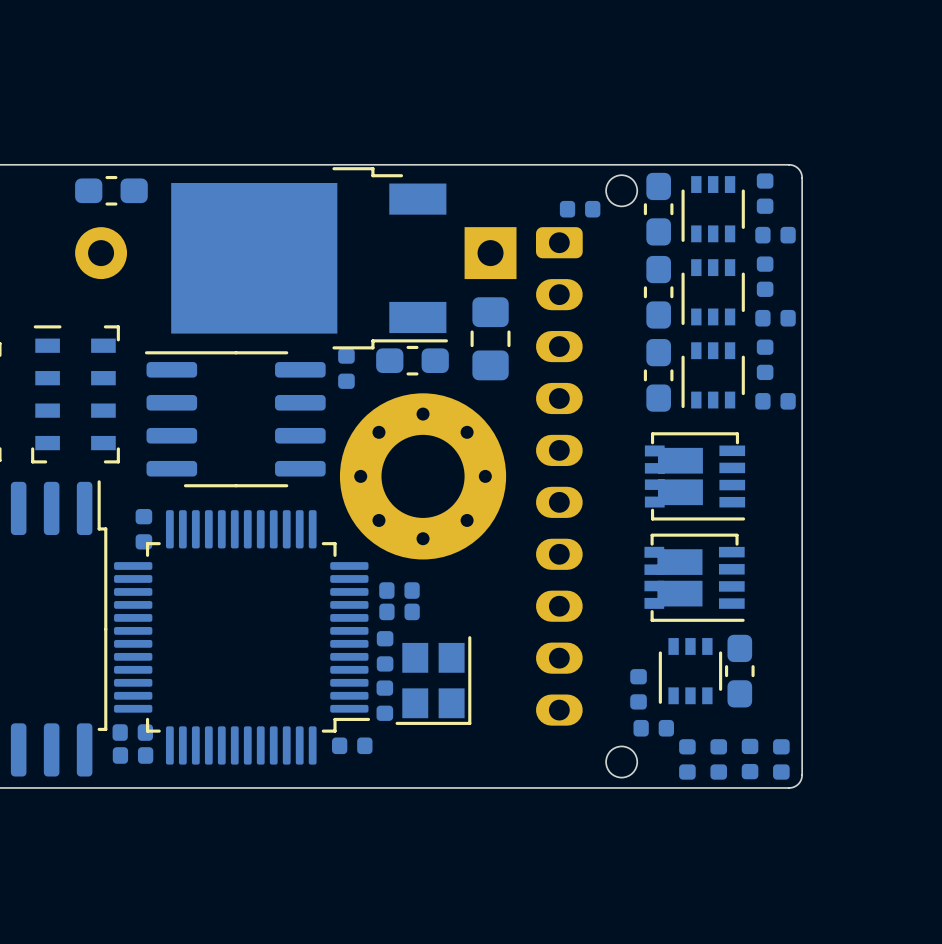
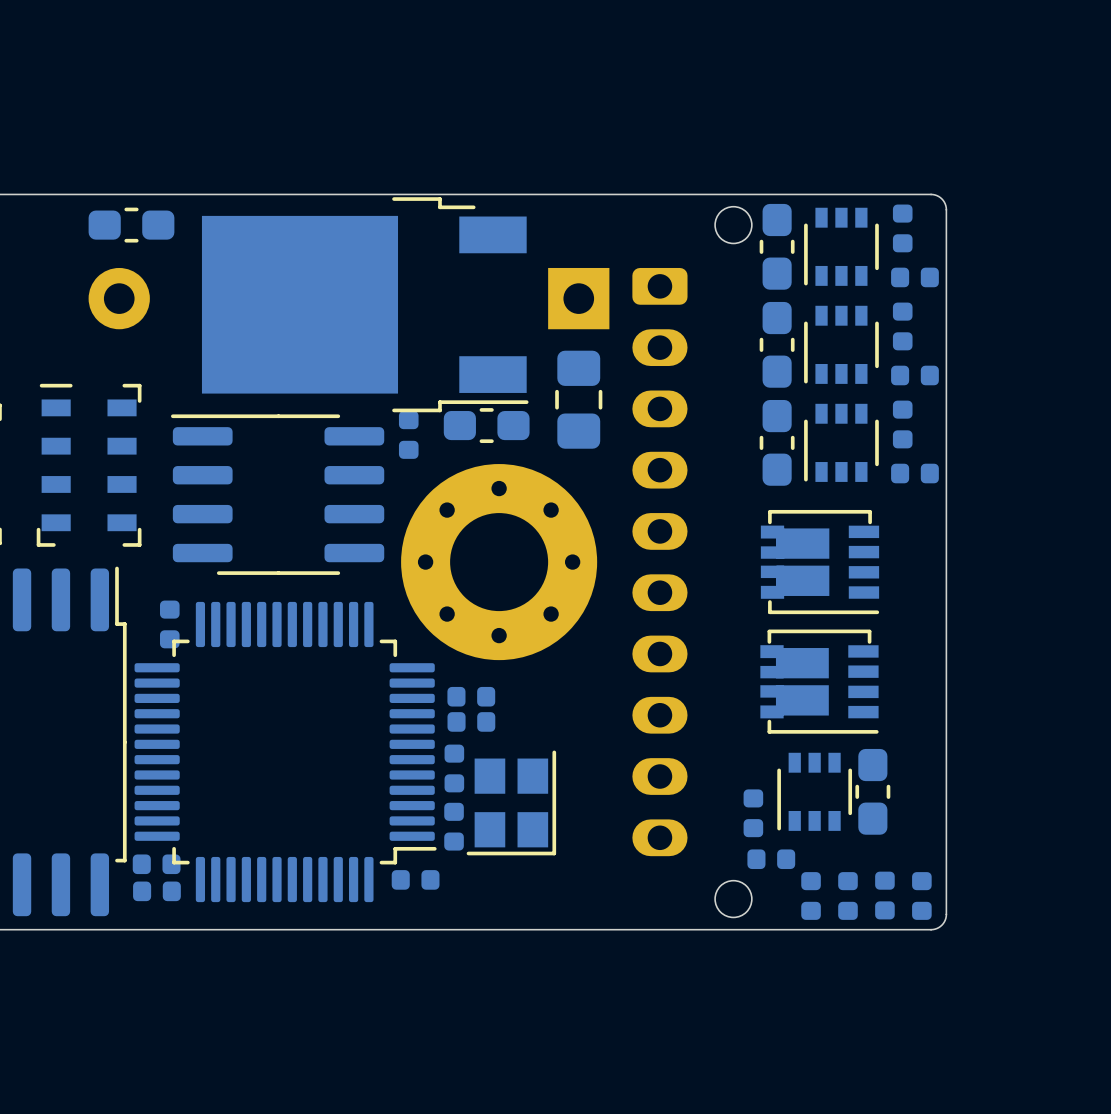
part: (580, 209) -> none

